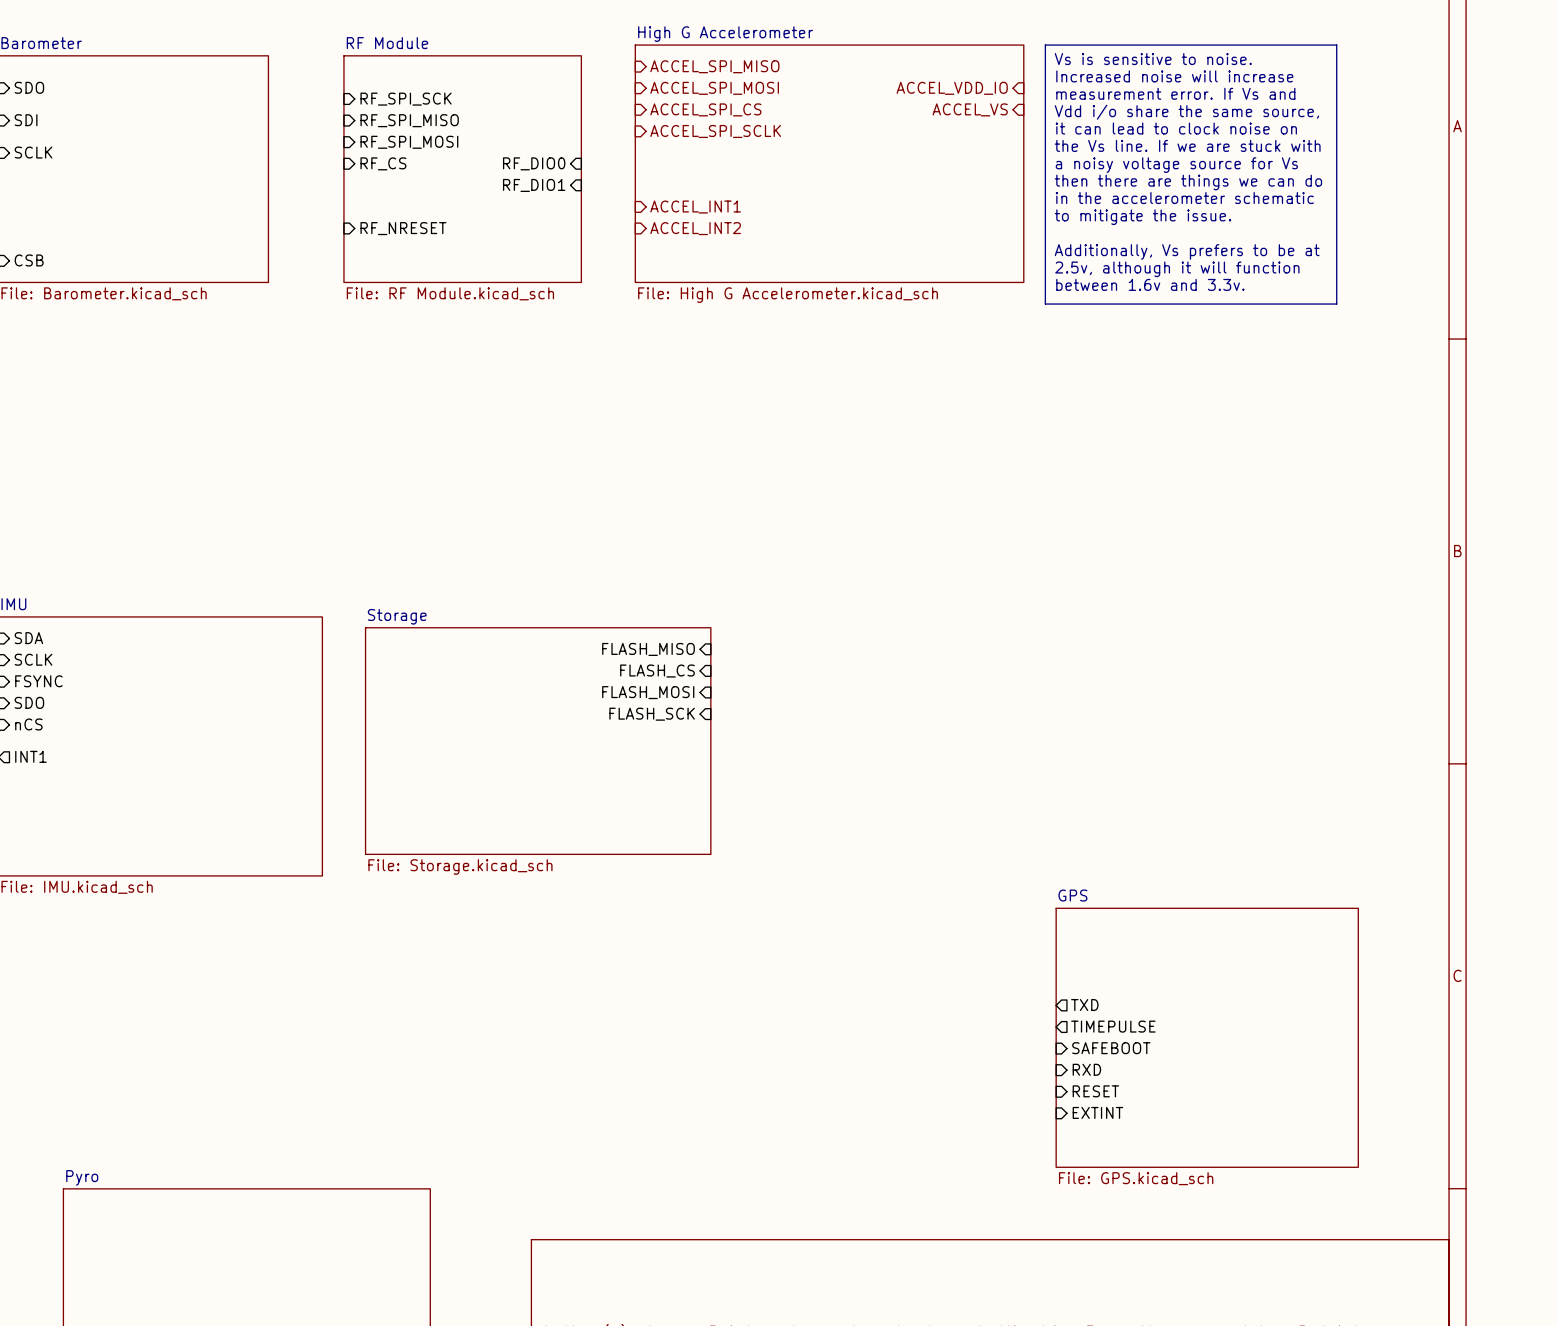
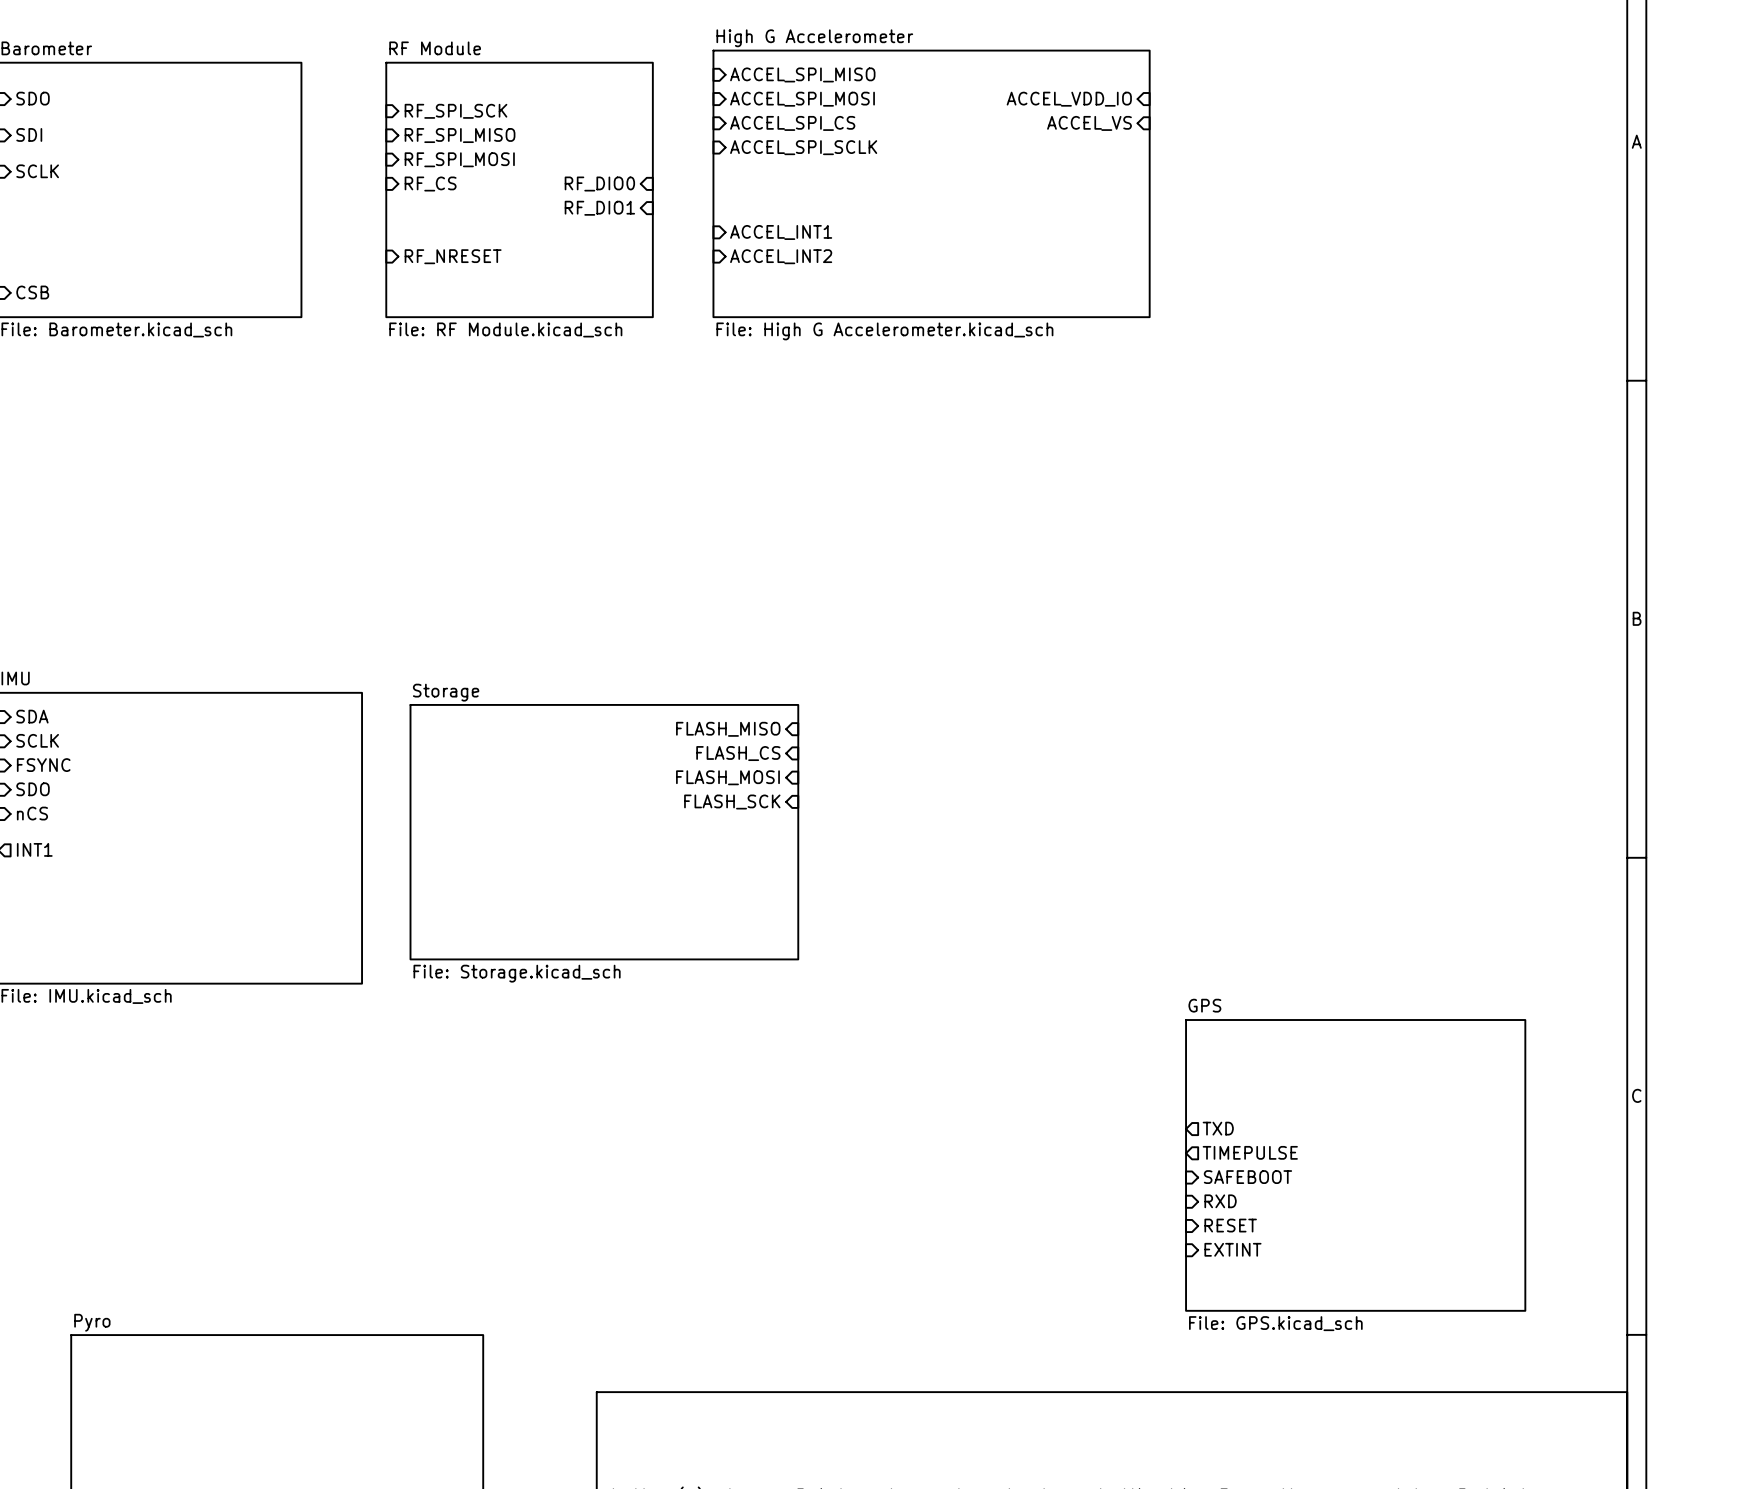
line: (1045, 45) (1336, 45) (1336, 304) (1045, 304) (1045, 45) -> none
text: Vs is sensitive to noise. (1153, 59) -> none
text: Increased noise will increase (1174, 76) -> none
text: measurement error. If Vs and (1175, 93) -> none
text: Vdd i/o share the same source, (1186, 112) -> none
text: it can lead to clock noise on (1176, 128) -> none
text: the Vs line. If we are stuck with (1187, 145) -> none
text: a noisy voltage source for Vs (1176, 165) -> none
text: then there are things we can do (1188, 182) -> none
text: in the accelerometer schematic (1184, 198) -> none
text: to mitigate the issue. (1142, 217) -> none
text: Additionally, Vs prefers to be at (1187, 251) -> none
text: 2.5v, although it will function (1177, 269) -> none
text: between 1.6v and 3.3v. (1150, 284) -> none

